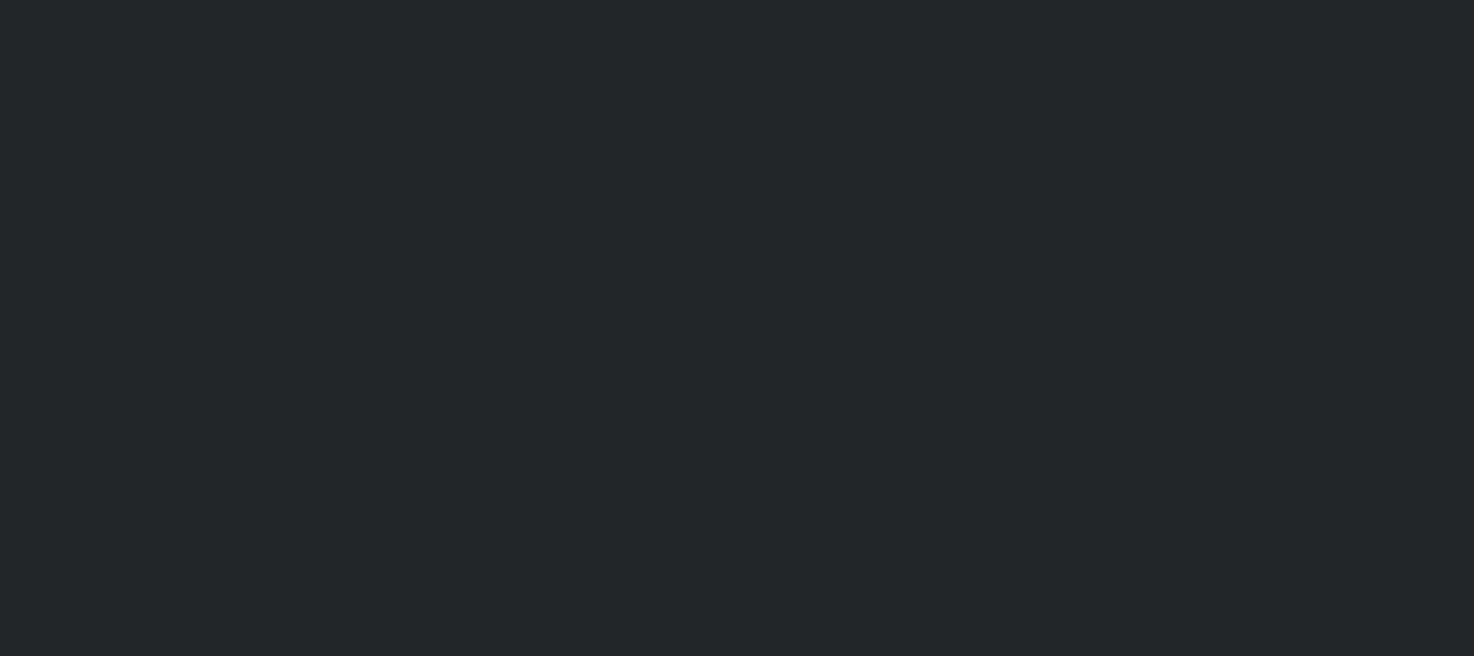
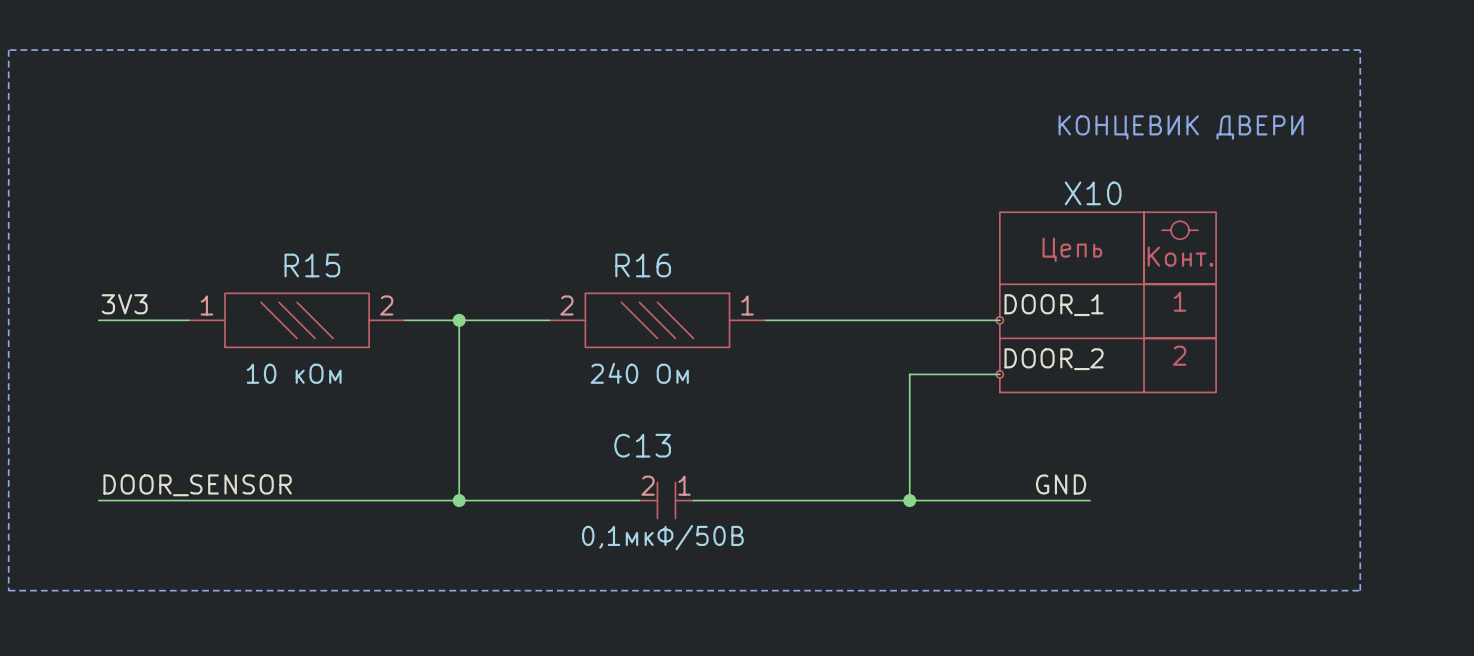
line: none -> (8, 50) (1360, 50) (1360, 590) (8, 590) (8, 50)
text: none -> КОНЦЕВИК ДВЕРИ (1181, 127)
X10: none -> (1106, 302)
label: none -> 3V3 (124, 304)
label: none -> DOOR_1 (1054, 305)
wire: none -> (98, 320) (188, 320)
R15: none -> (297, 320)
wire: none -> (405, 320) (549, 320)
wire: none -> (459, 320) (459, 500)
junction: none -> (459, 320)
R16: none -> (657, 320)
wire: none -> (765, 320) (999, 320)
label: none -> DOOR_2 (1054, 359)
wire: none -> (999, 374) (909, 374) (909, 500)
label: none -> GND (1061, 484)
label: none -> DOOR_SENSOR (197, 485)
wire: none -> (98, 500) (639, 500)
junction: none -> (459, 500)
C13: none -> (666, 500)
wire: none -> (693, 500) (1089, 500)
junction: none -> (909, 500)

